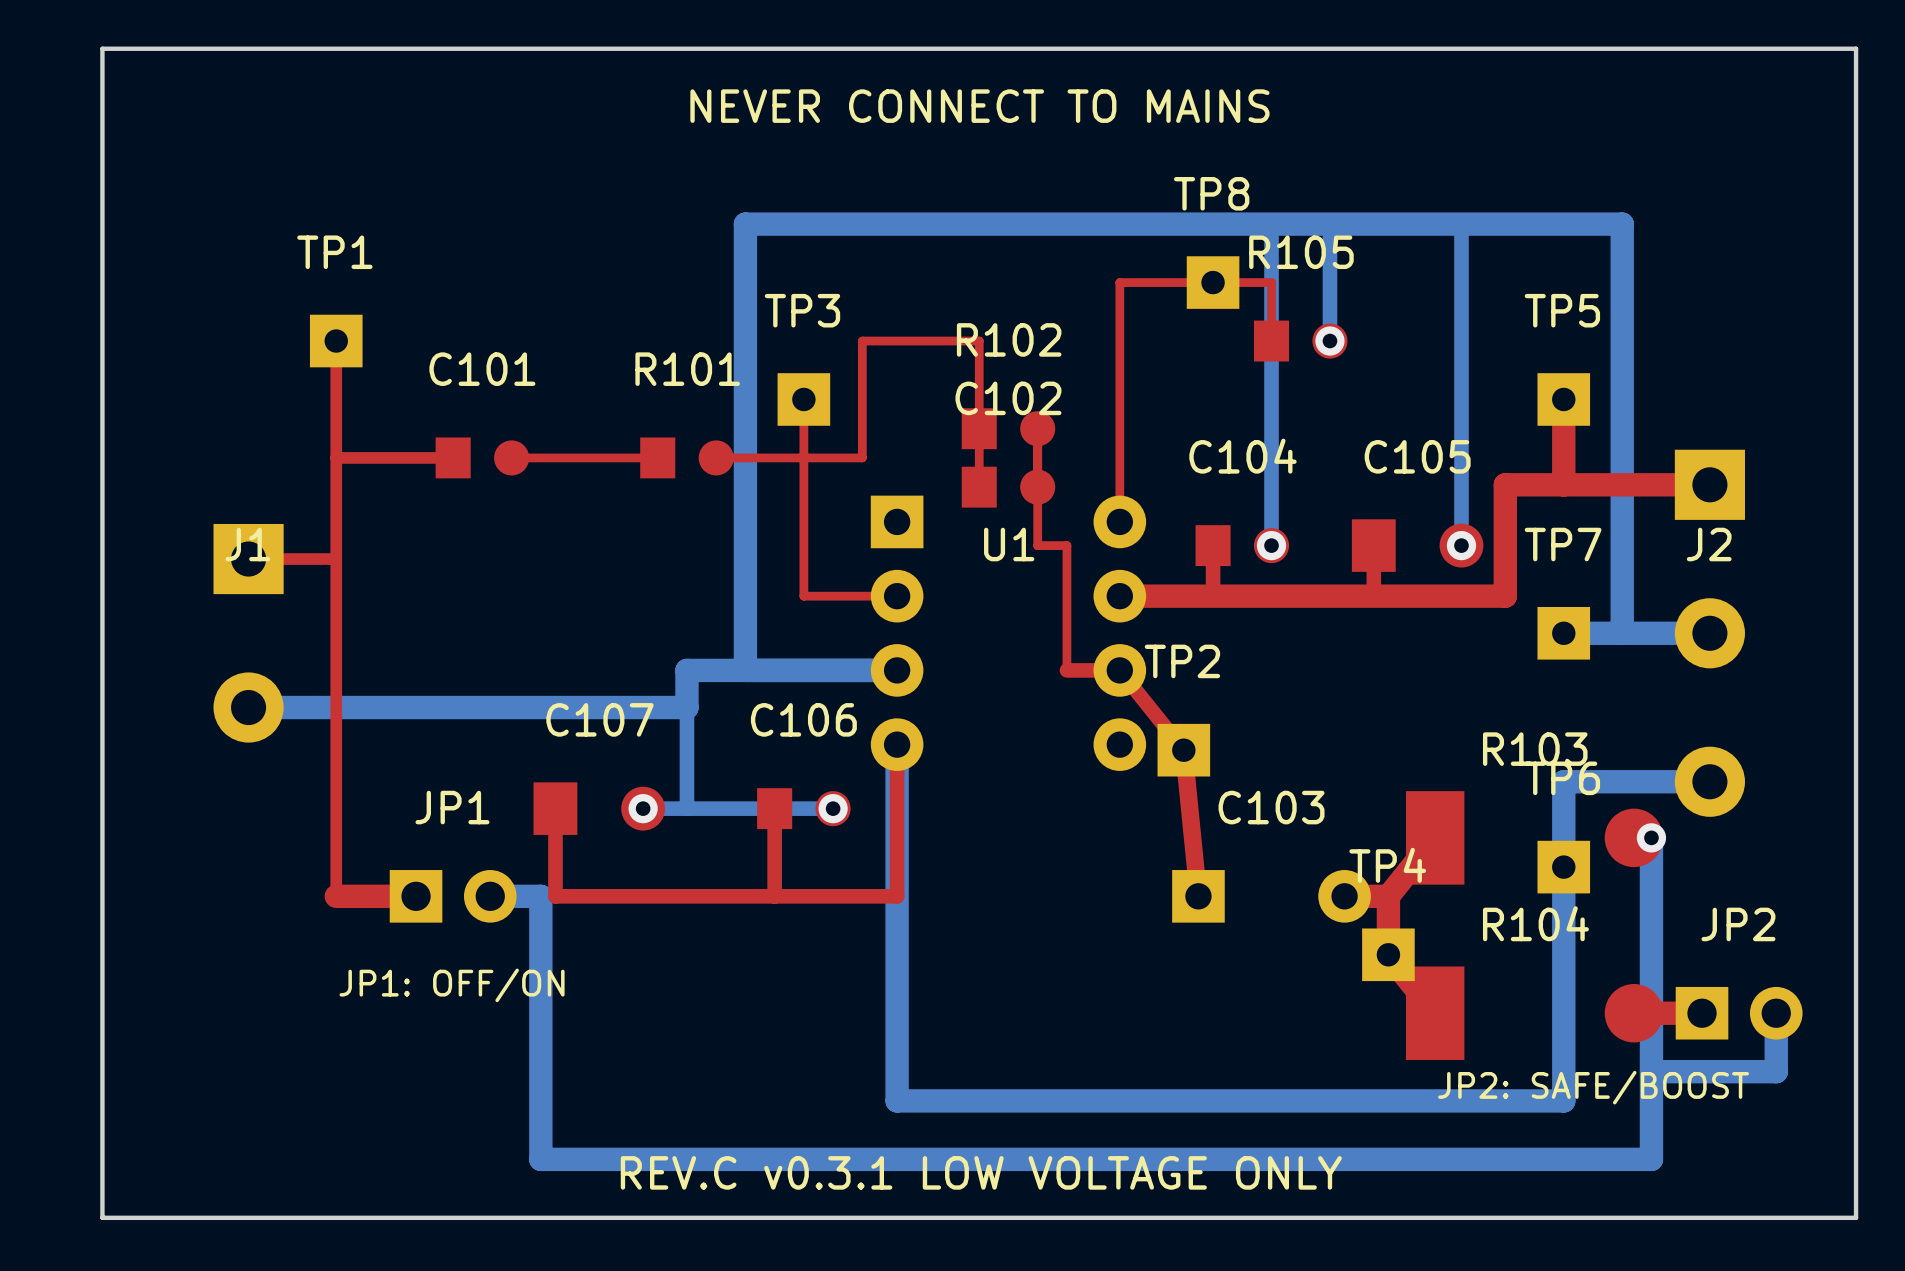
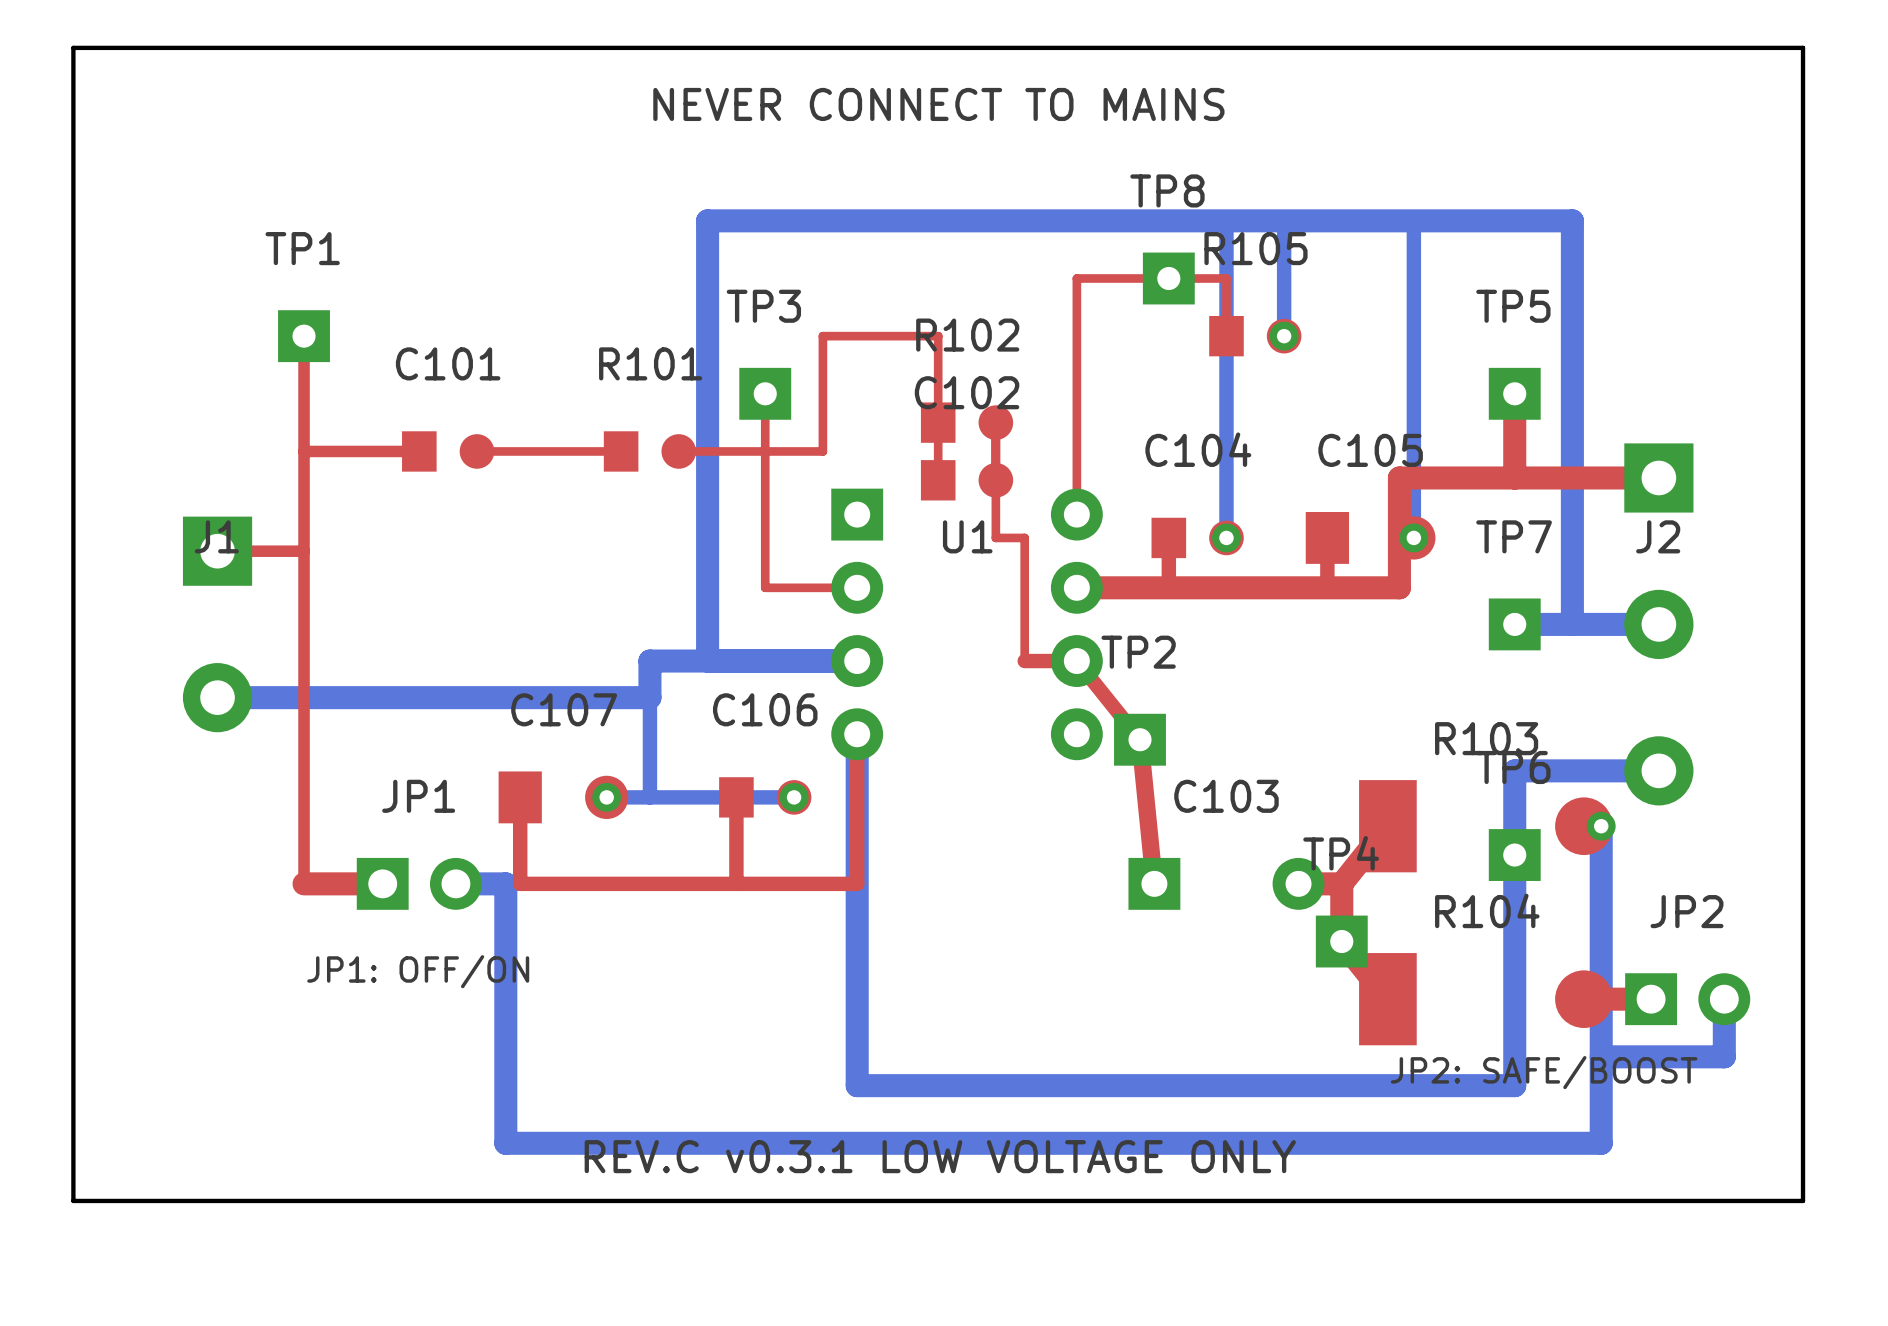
top track: (1505, 484) (1505, 596) (1446, 596) -> (1457, 477) (1399, 477) (1399, 587)

